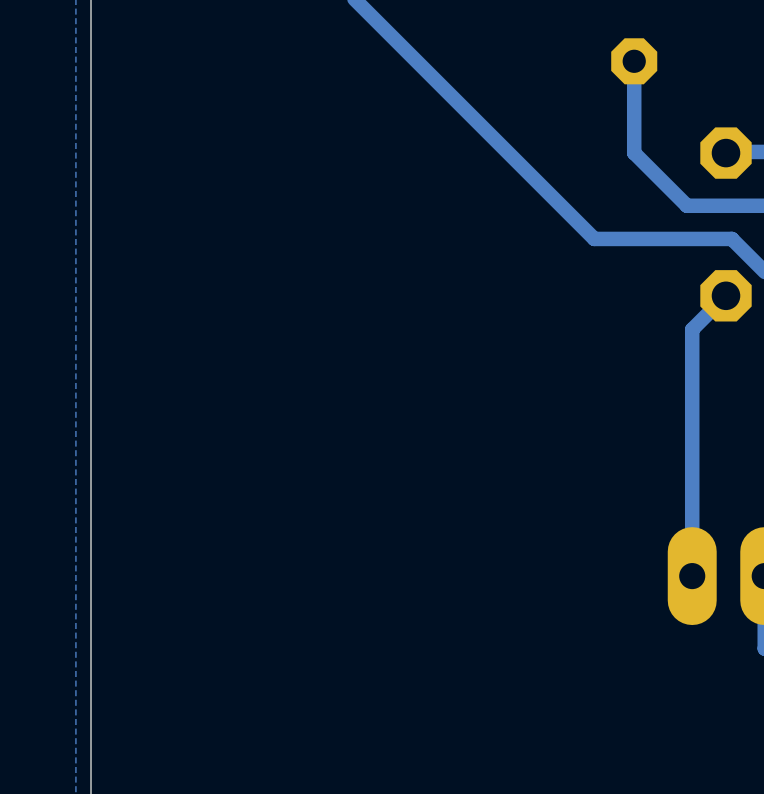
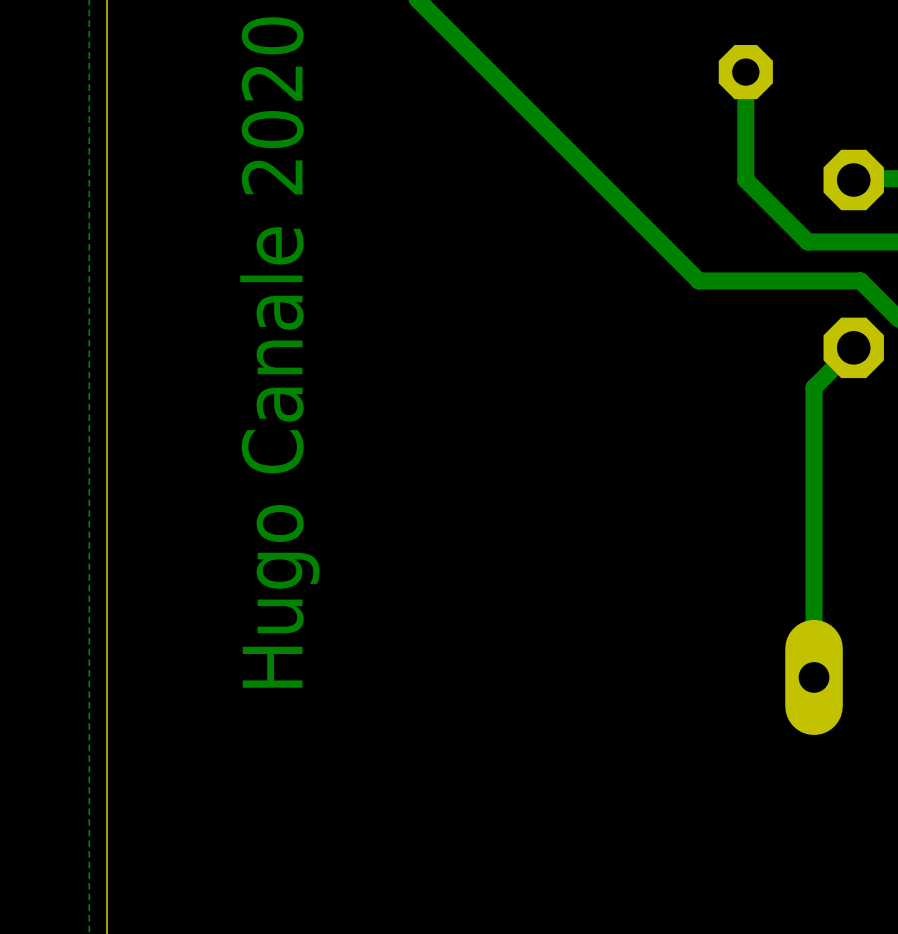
text: none -> Hugo Canale 2020 (279, 352)

